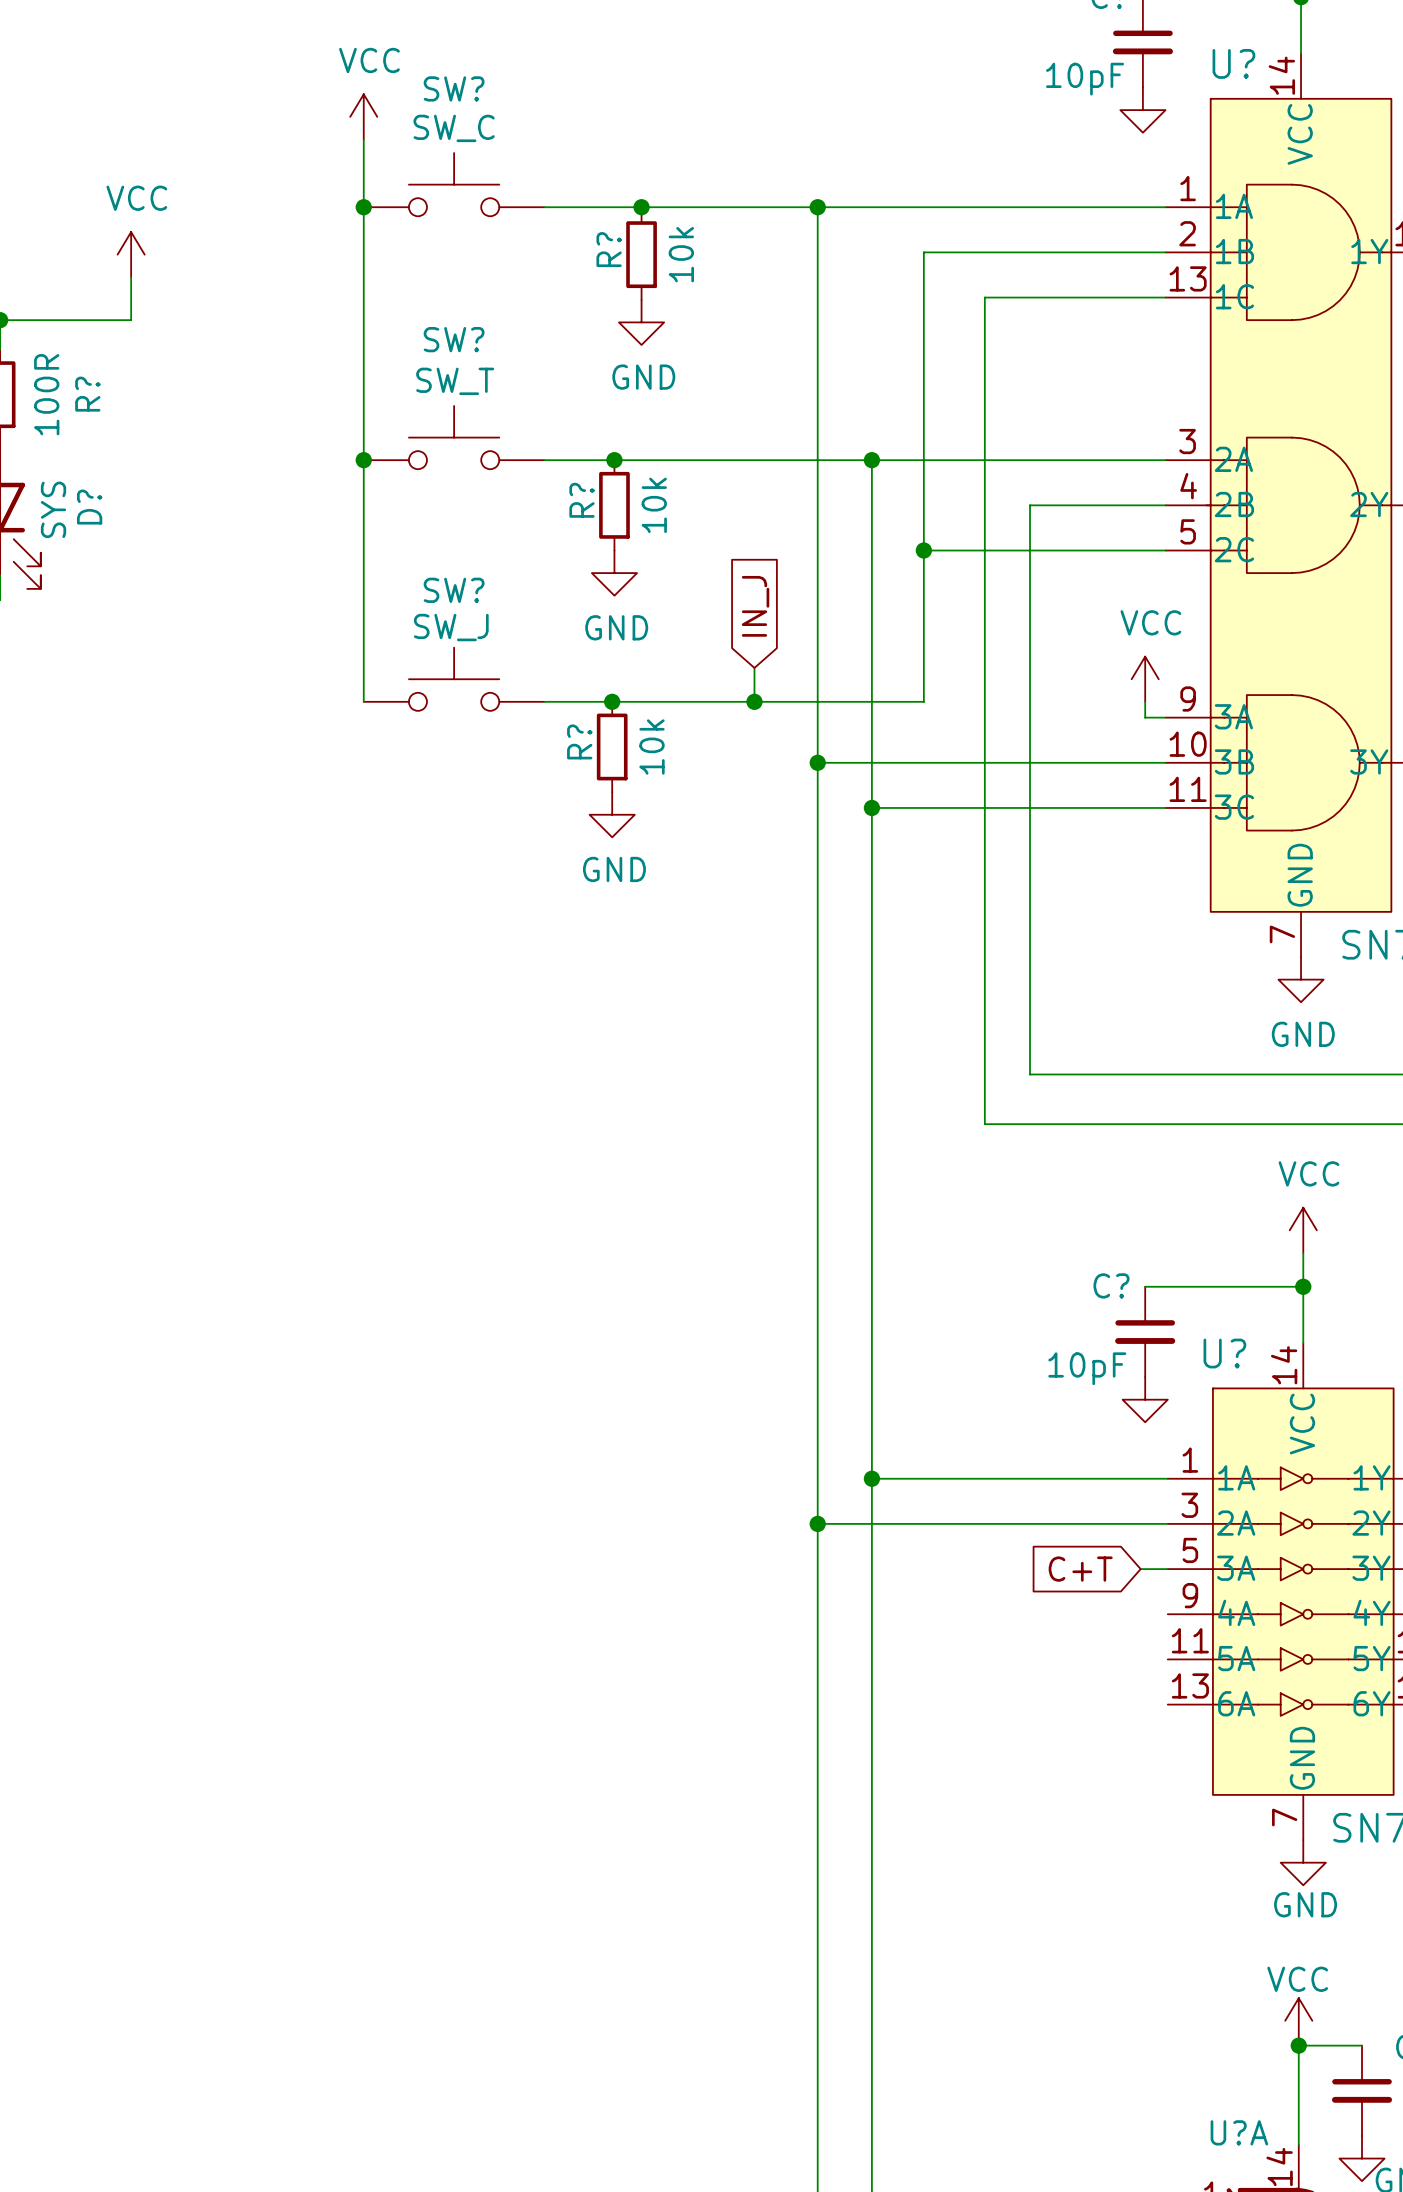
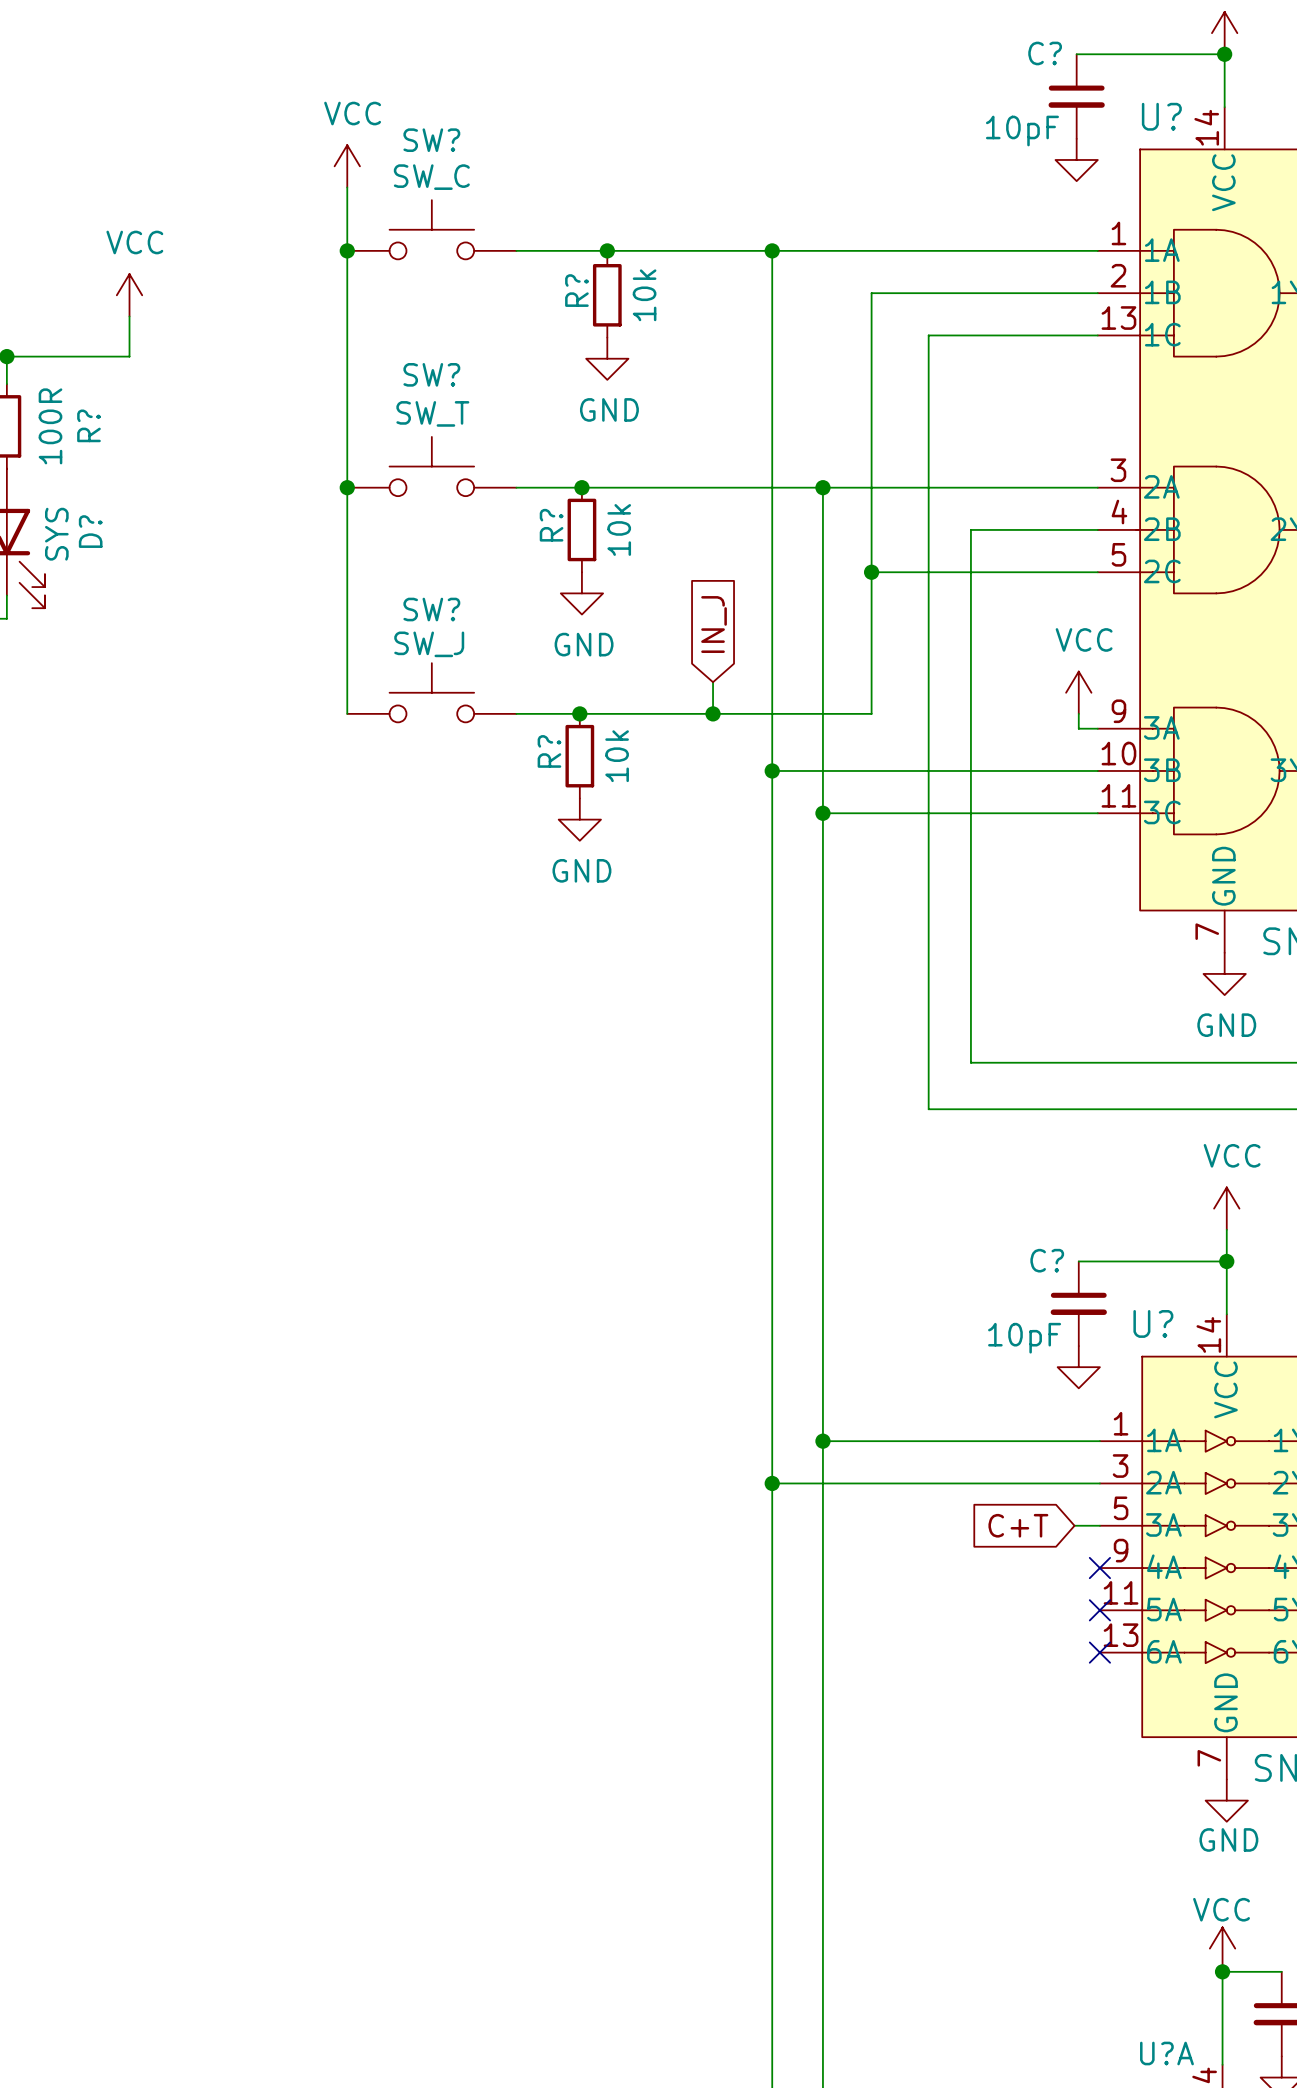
no-connect mark: none -> (1099, 1568)
no-connect mark: none -> (1099, 1610)
no-connect mark: none -> (1099, 1652)

